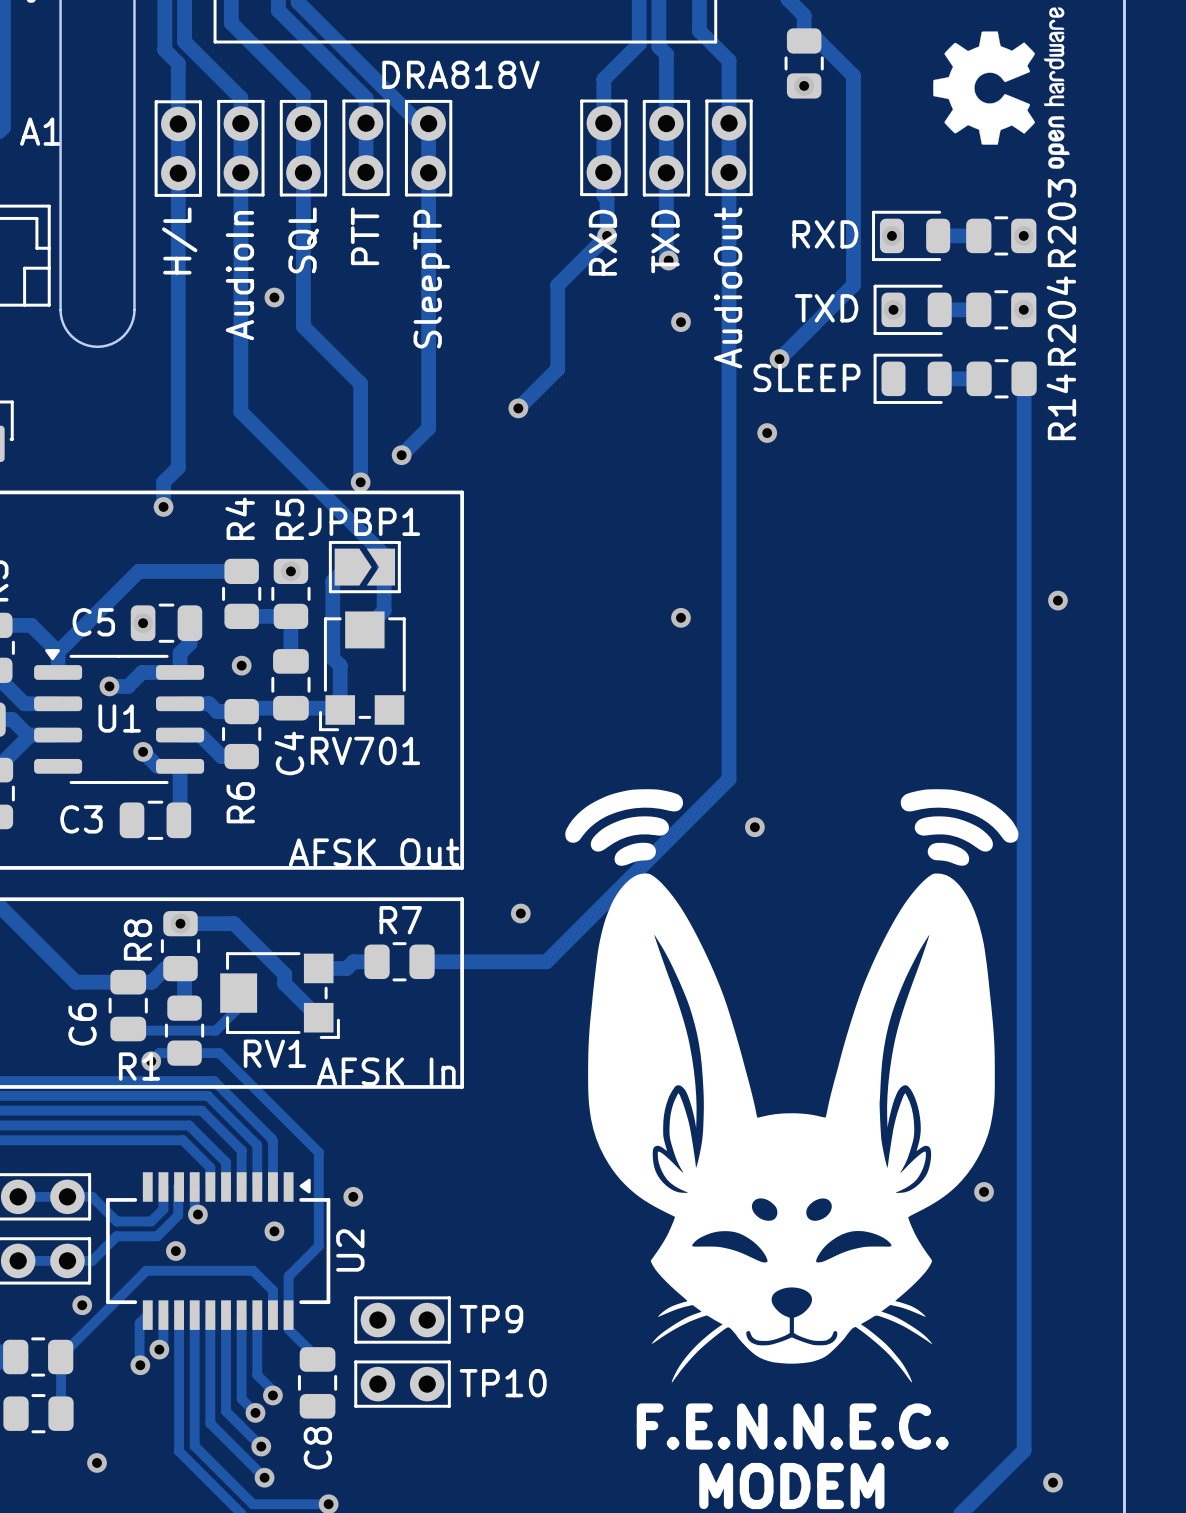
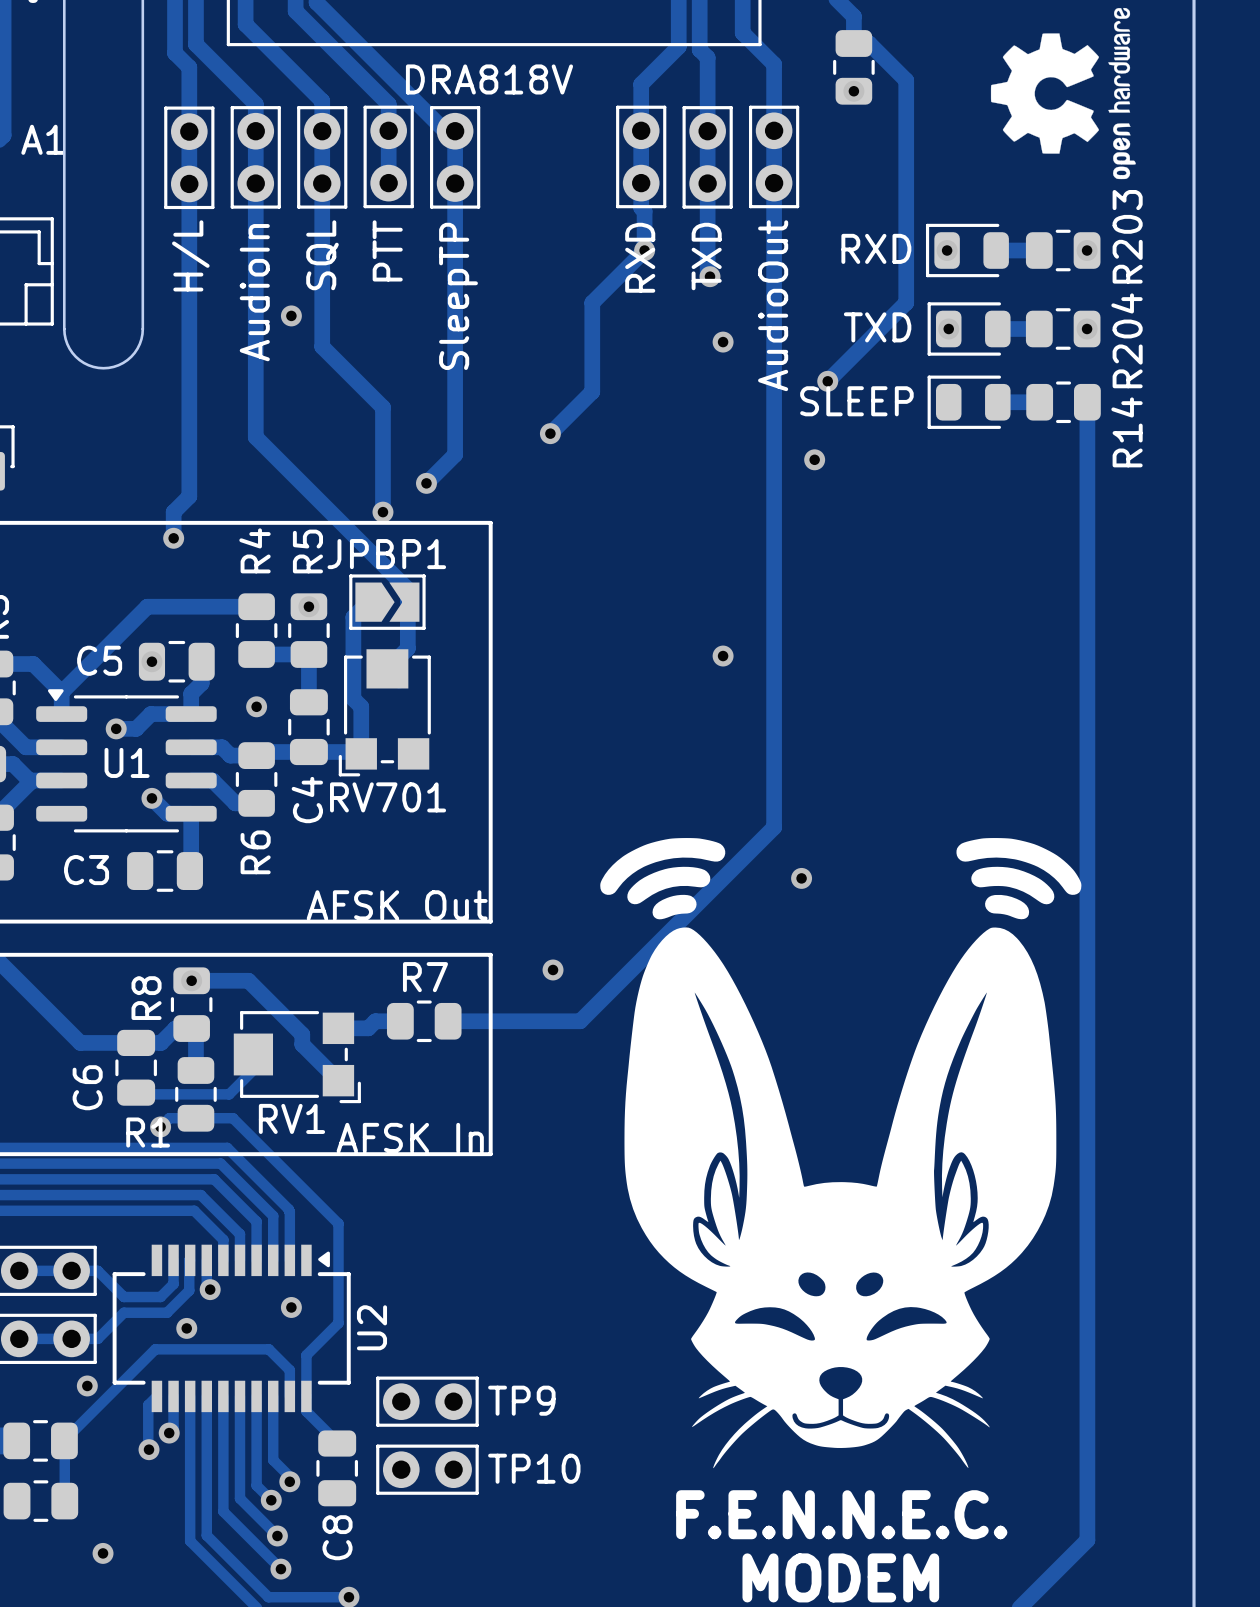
via: (1057, 600) -> none
via: (984, 1191) -> none
via: (353, 1196) -> none
via: (1053, 1482) -> none

